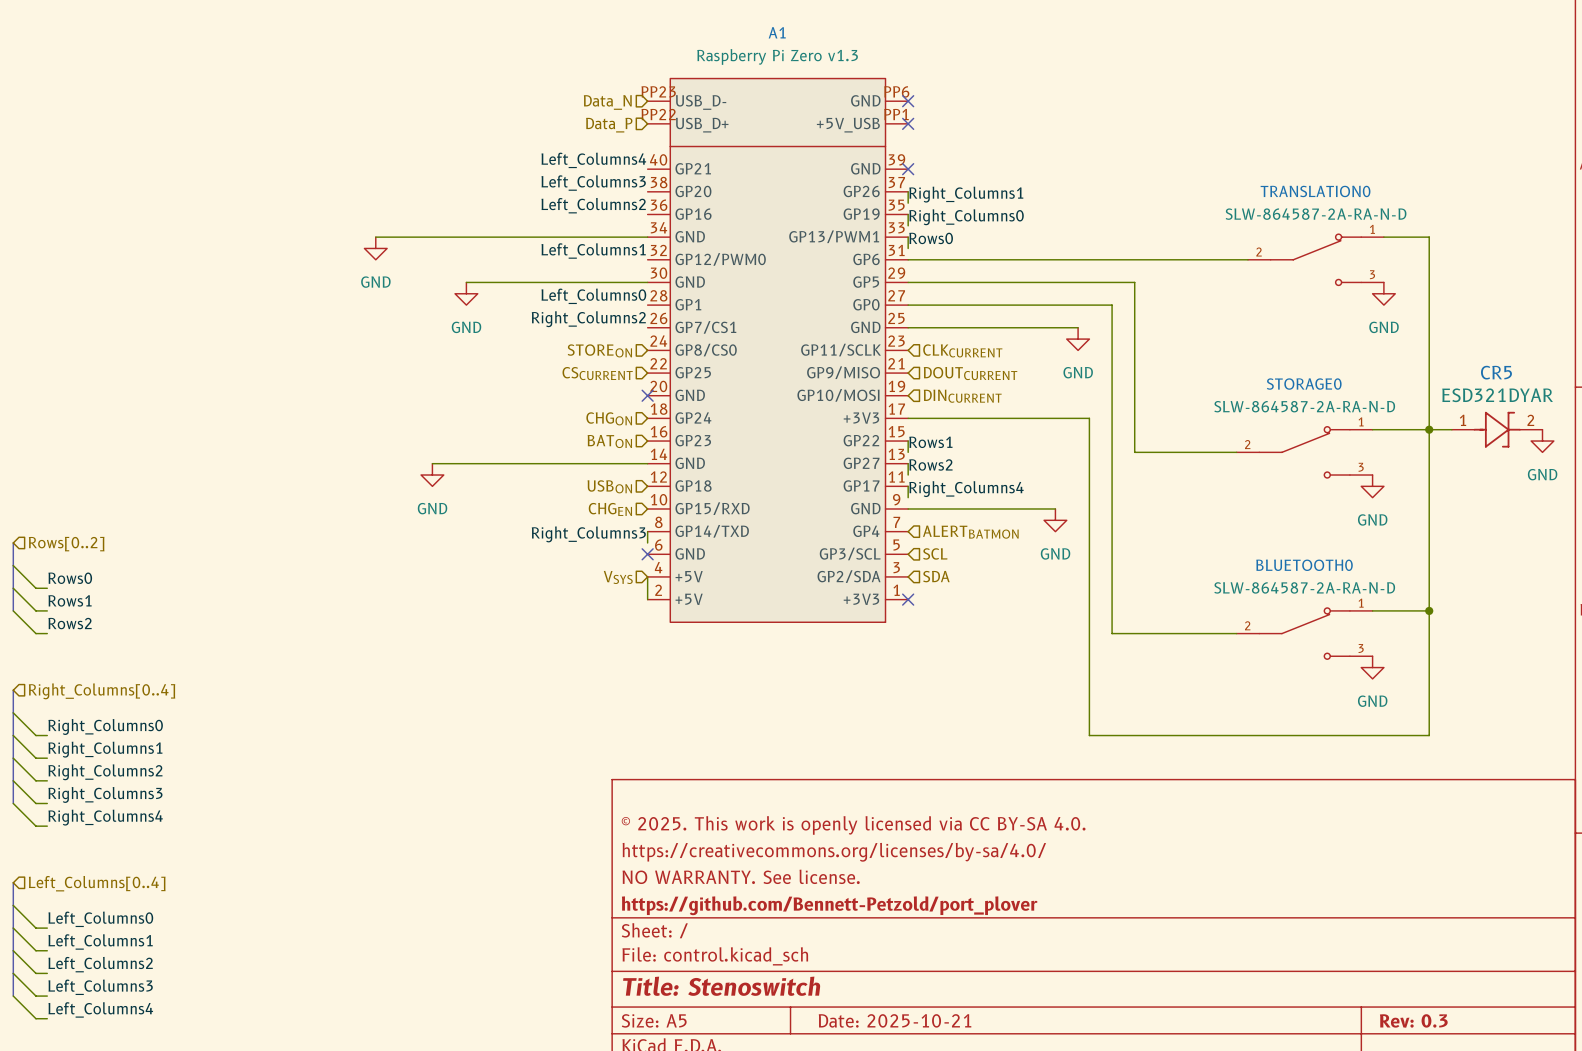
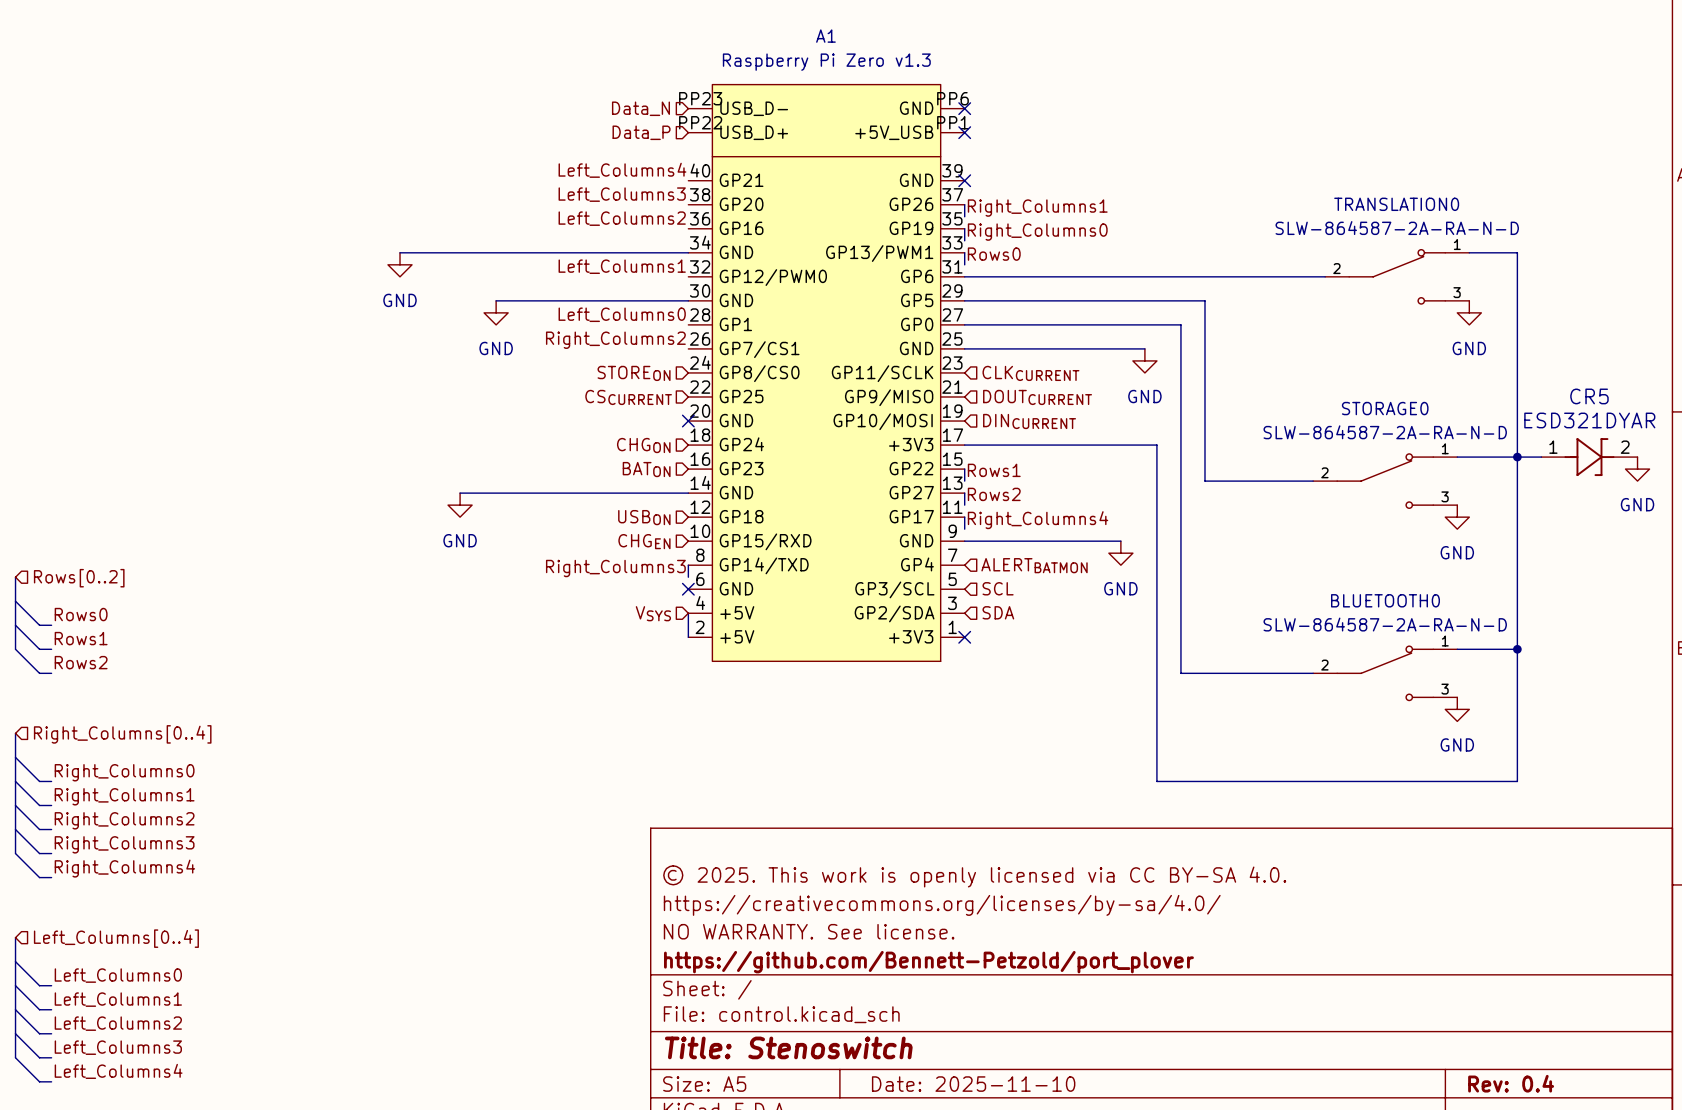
title block: Date: 2025-10-21 (895, 1020) -> Date: 2025-11-10 (973, 1084)
title block: Rev: 0.3 (1413, 1020) -> Rev: 0.4 (1511, 1083)

